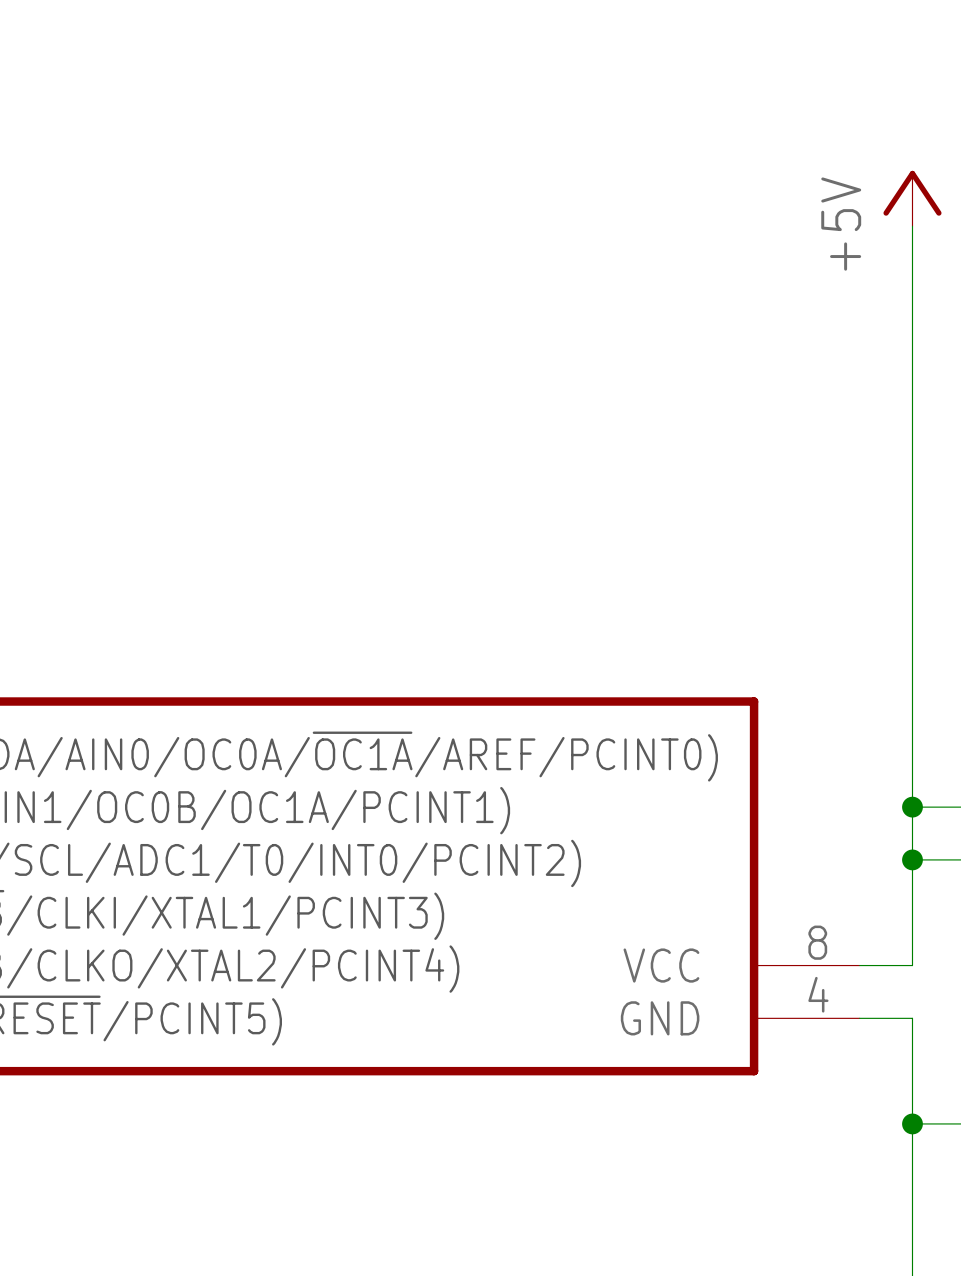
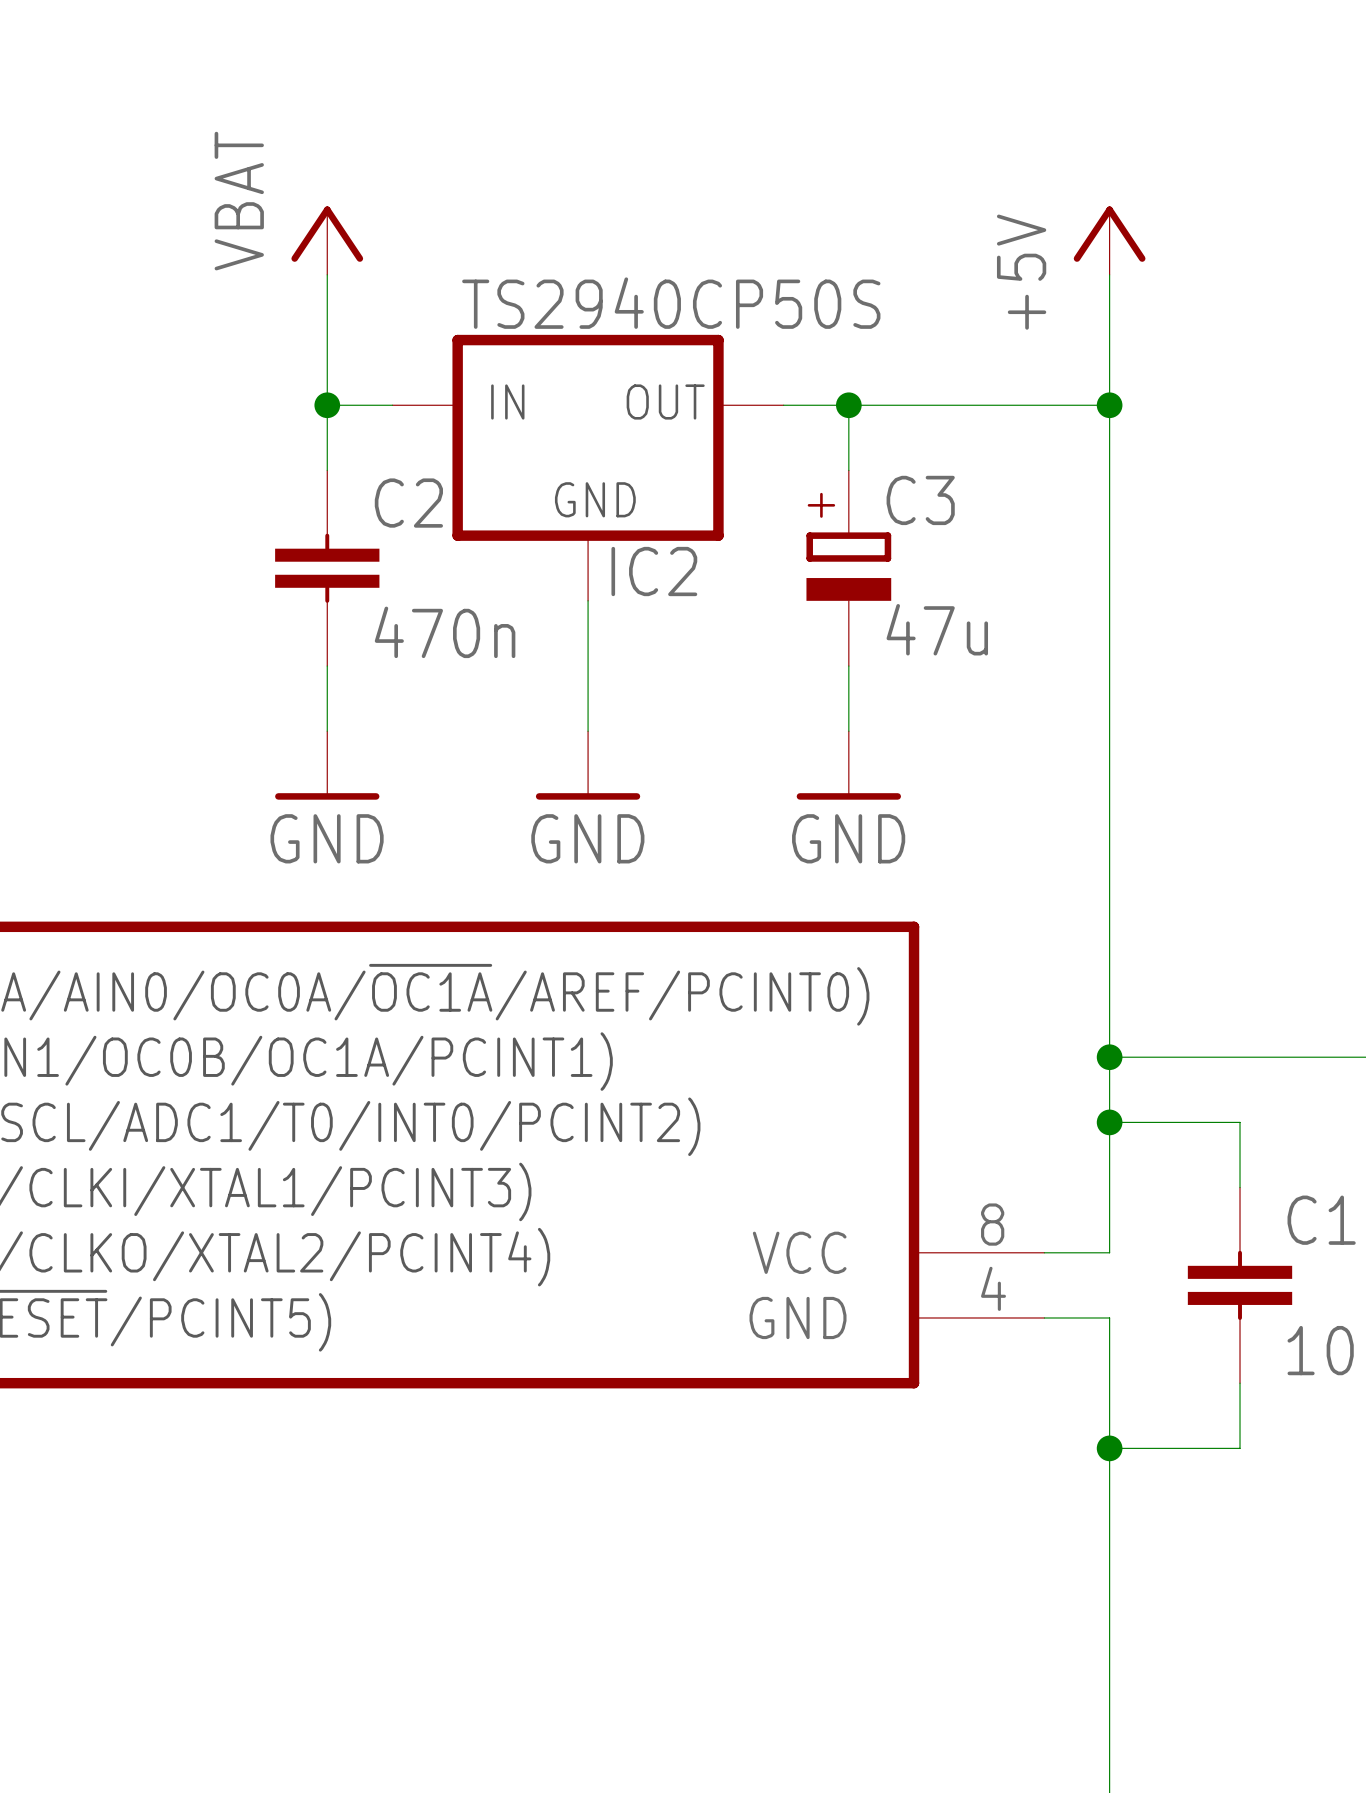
power symbol: none -> VBAT (327, 240)
wire: none -> (327, 274) (327, 470)
power symbol position: +5V (912, 198) -> +5V (1109, 240)
wire: none -> (327, 405) (392, 405)
junction: none -> (327, 405)
wire: none -> (783, 405) (1109, 405)
wire: none -> (848, 405) (848, 470)
junction: none -> (848, 405)
junction: none -> (1109, 405)
IC2: none -> TS2940CP50S (588, 467)
C2: none -> 470n (327, 568)
C3: none -> 47u (848, 568)
wire: none -> (588, 600) (588, 731)
wire: none -> (327, 666) (327, 731)
wire: none -> (848, 666) (848, 731)
power symbol: none -> GND (327, 765)
power symbol: none -> GND (588, 765)
power symbol: none -> GND (848, 765)

